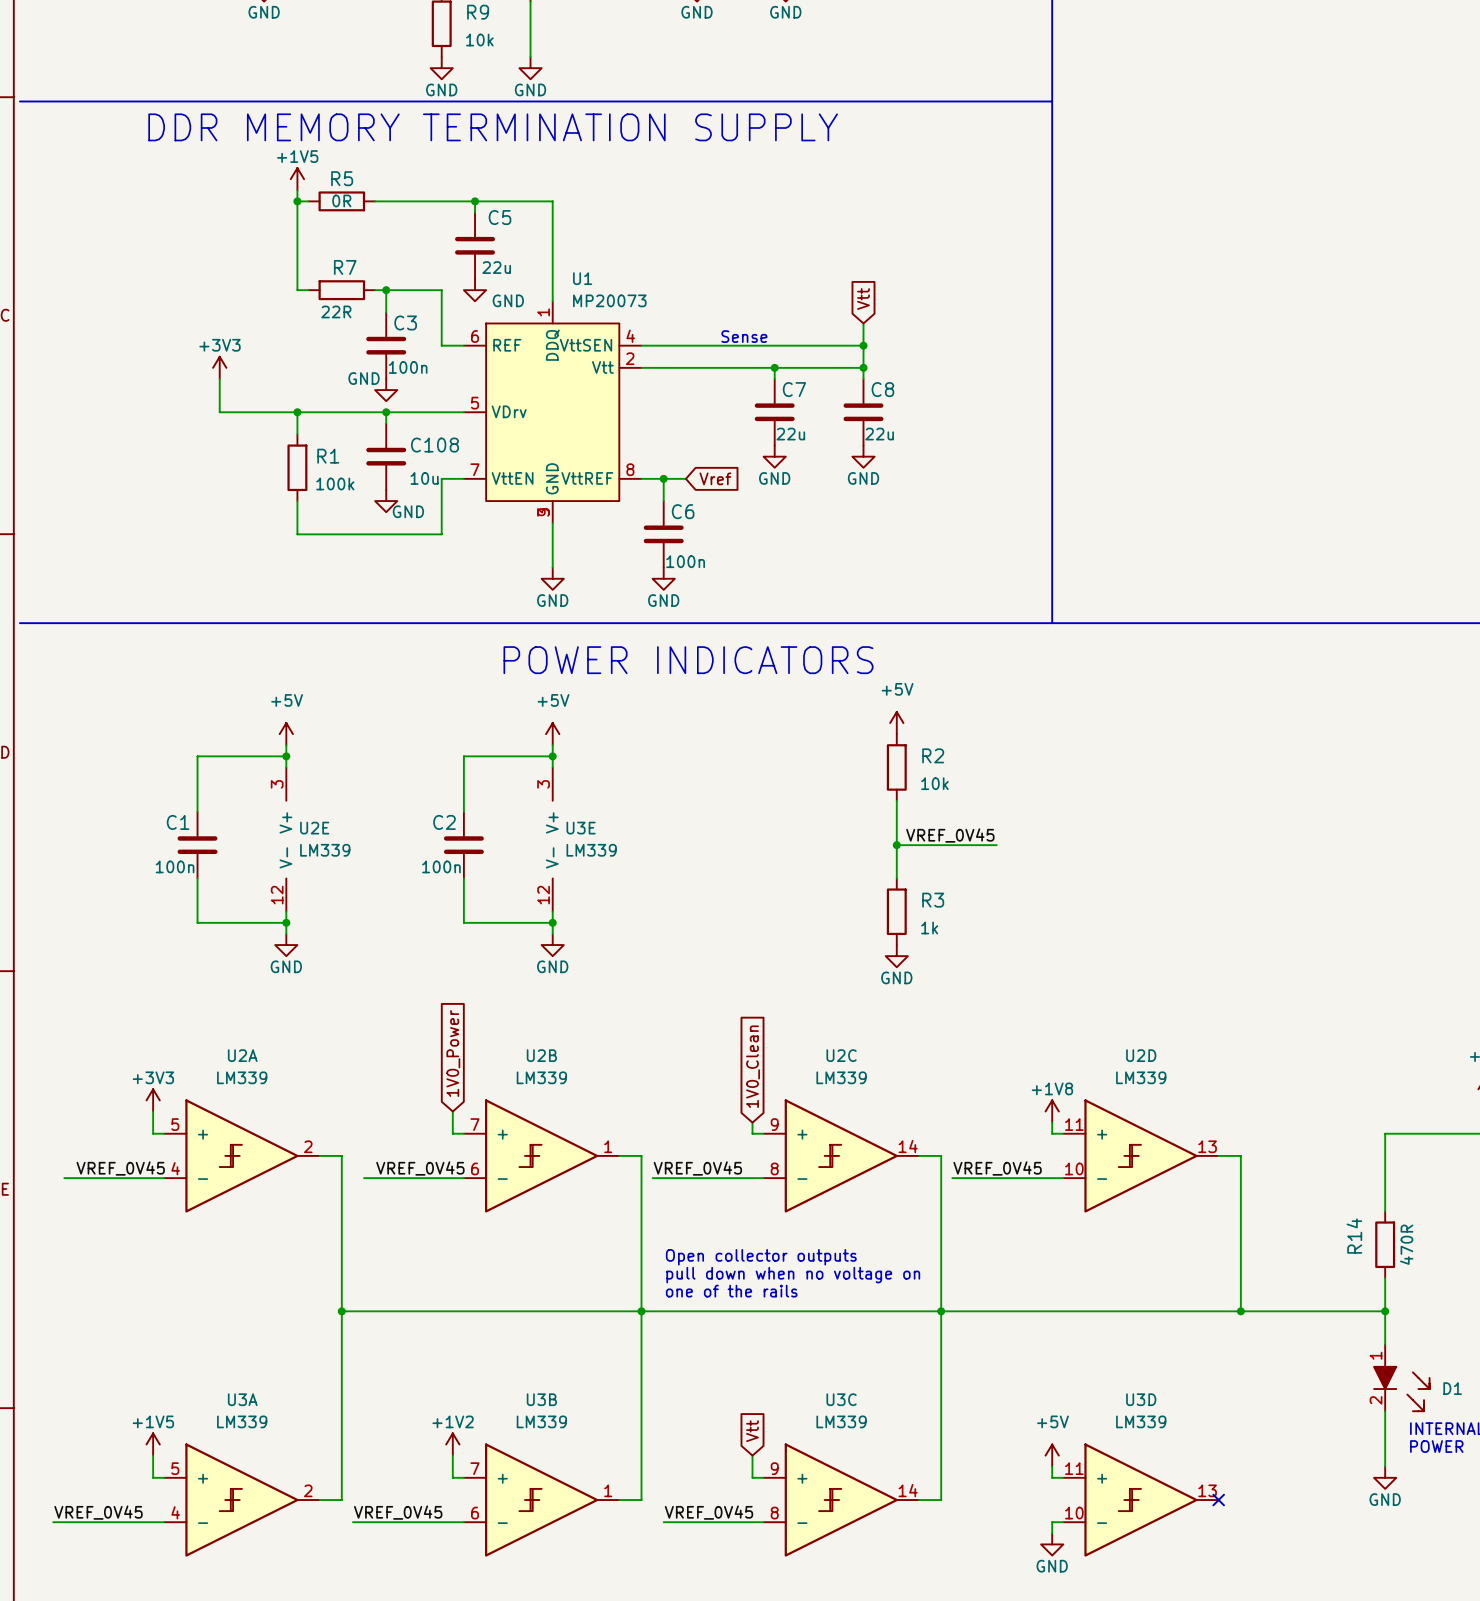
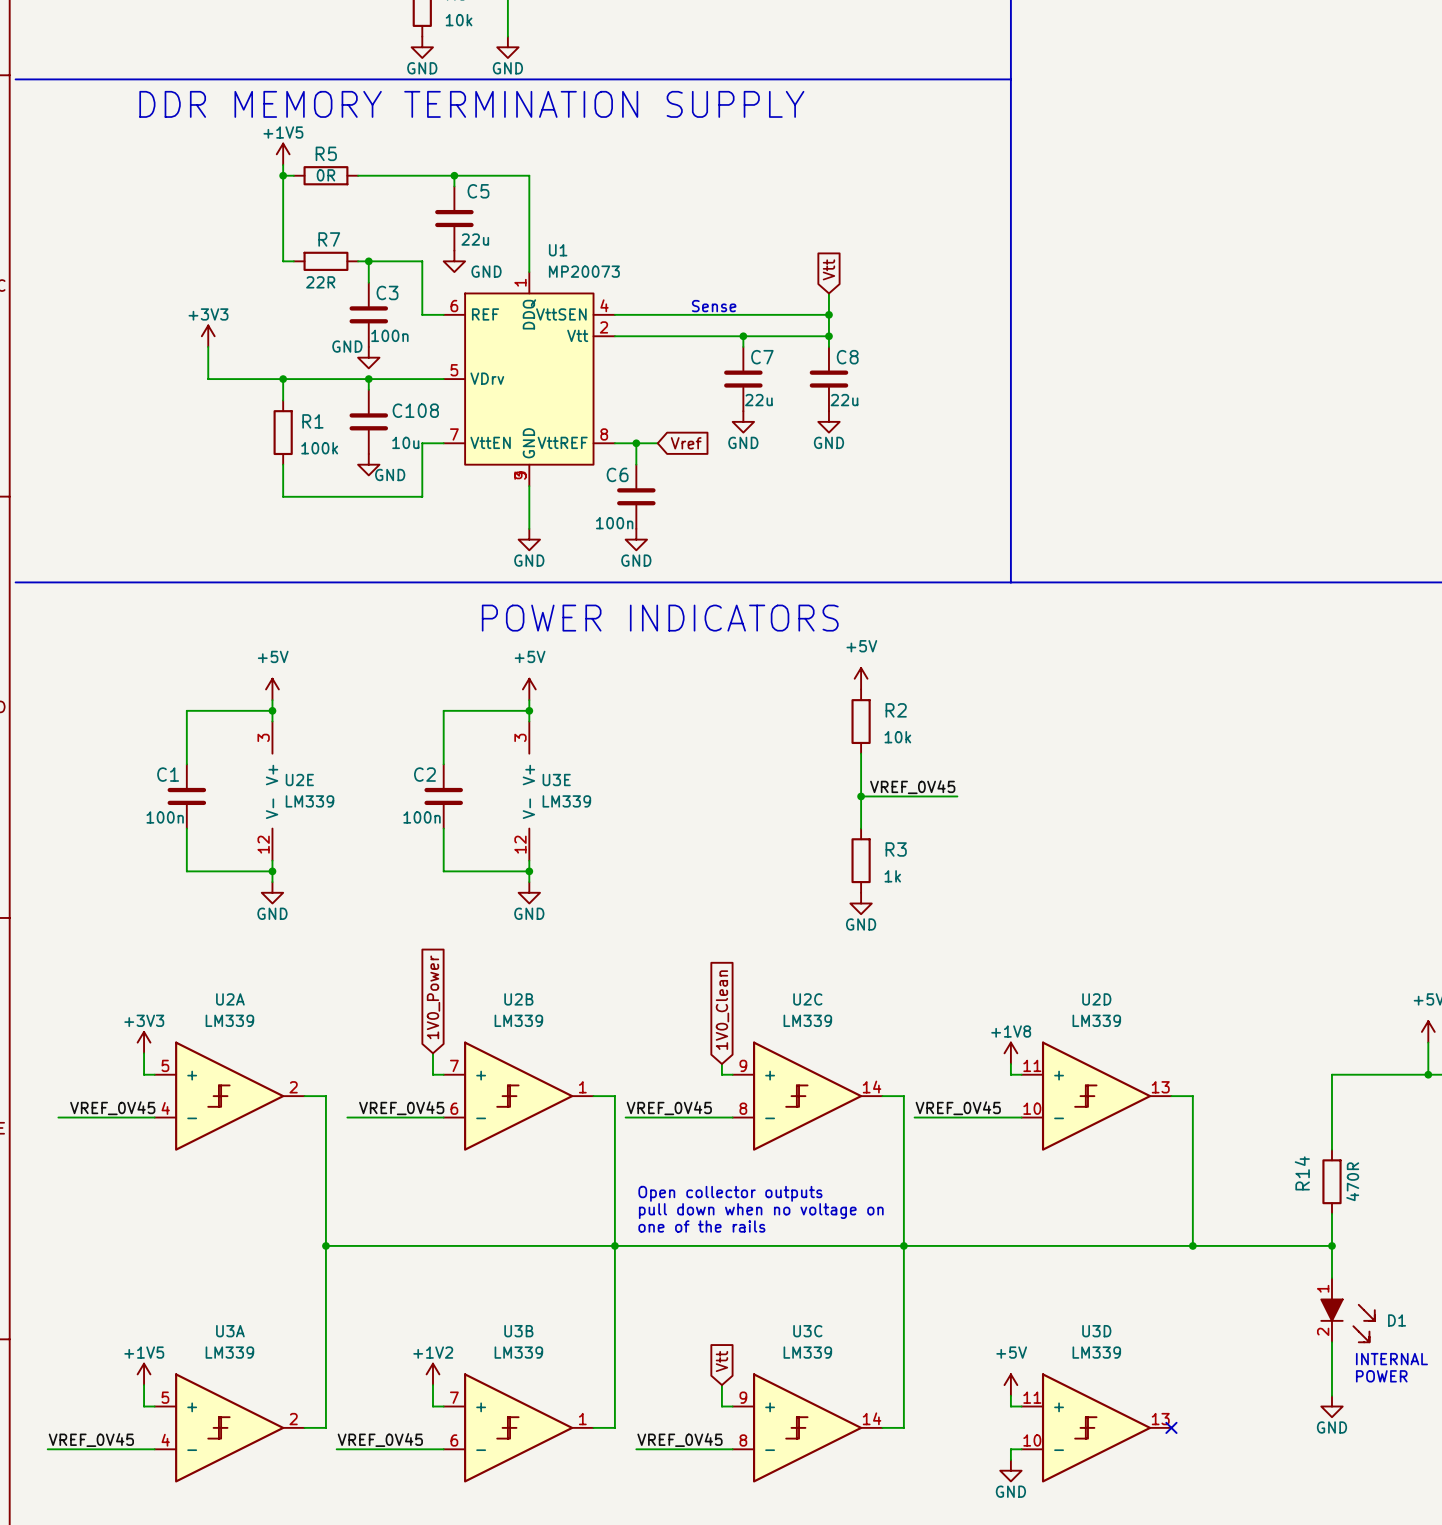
C6 name position: C6 (683, 511) -> C6 (617, 474)
C6 text position: 100n (685, 561) -> 100n (614, 523)

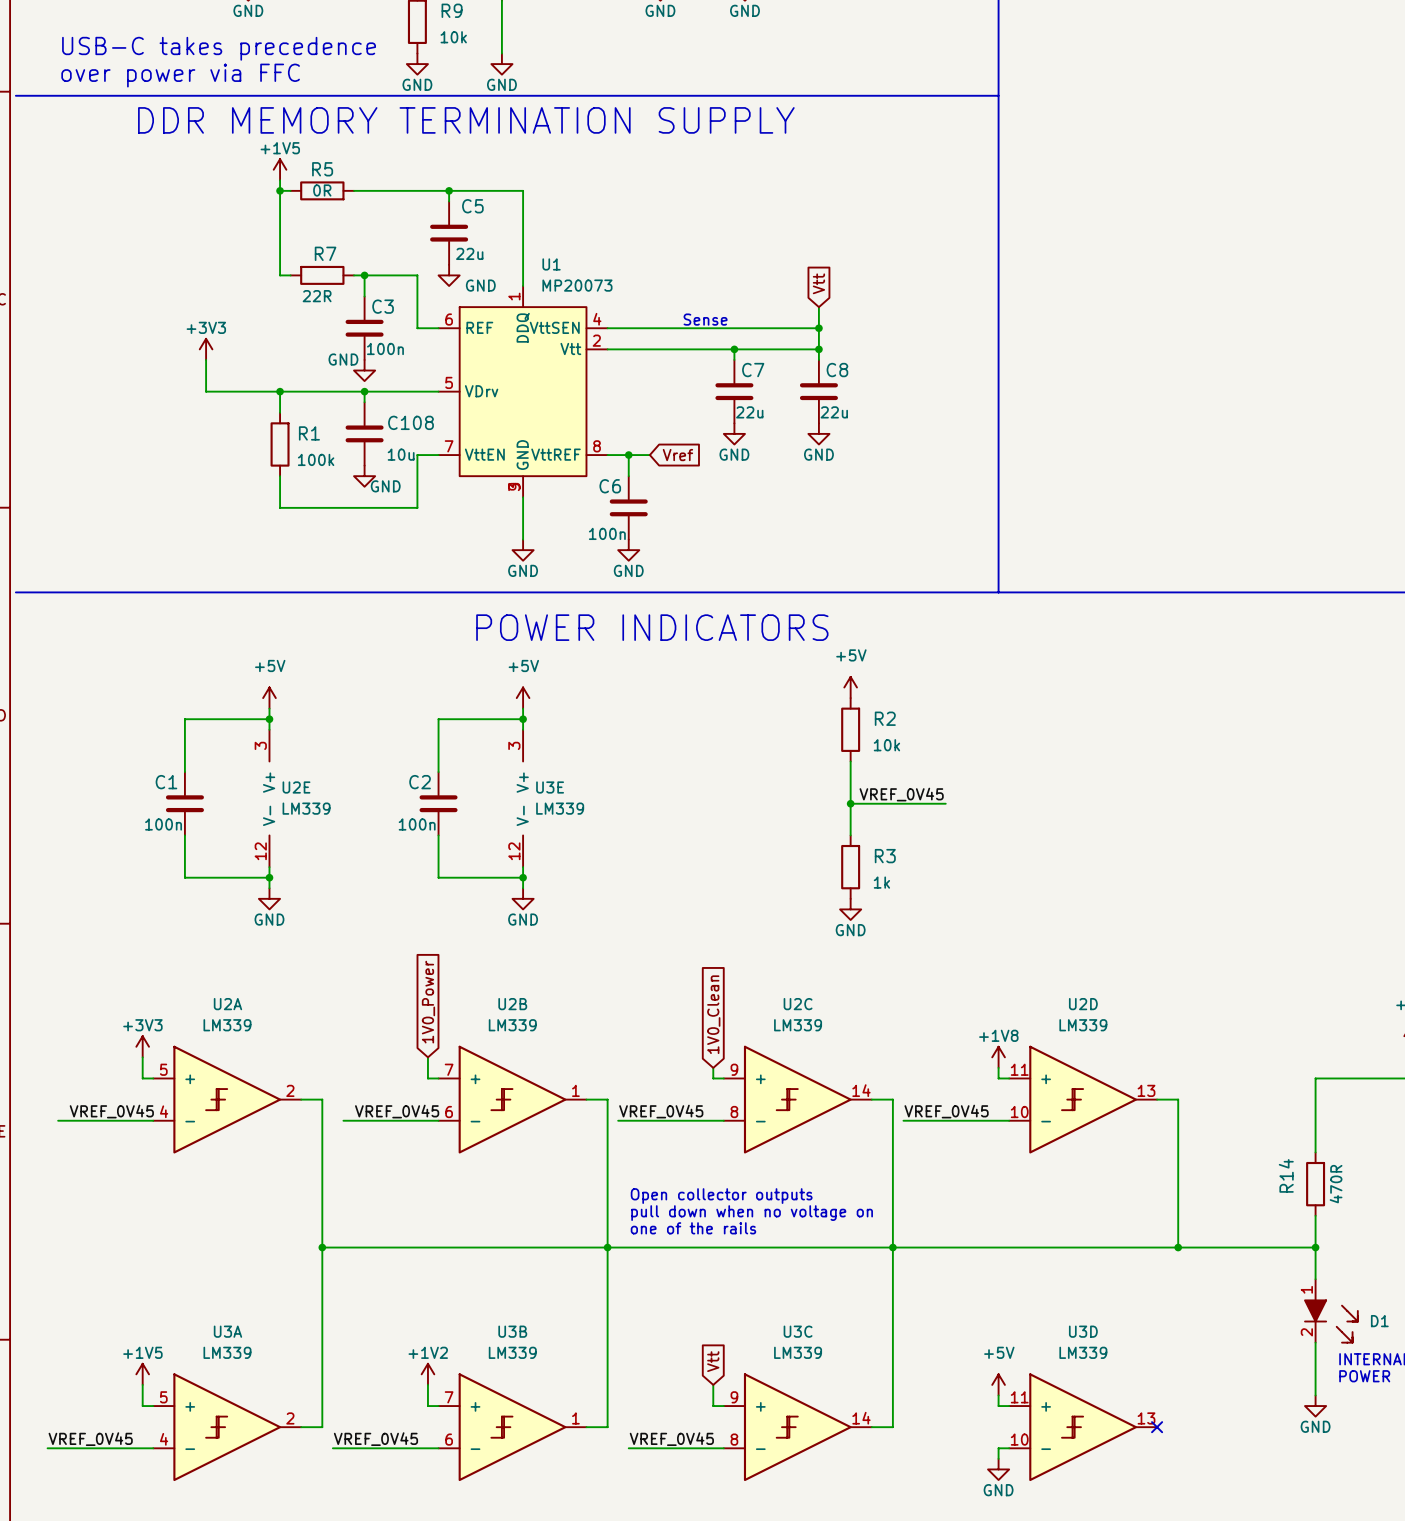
text: none -> USB-C takes precedence (219, 48)
text: none -> over power via FFC (180, 75)

